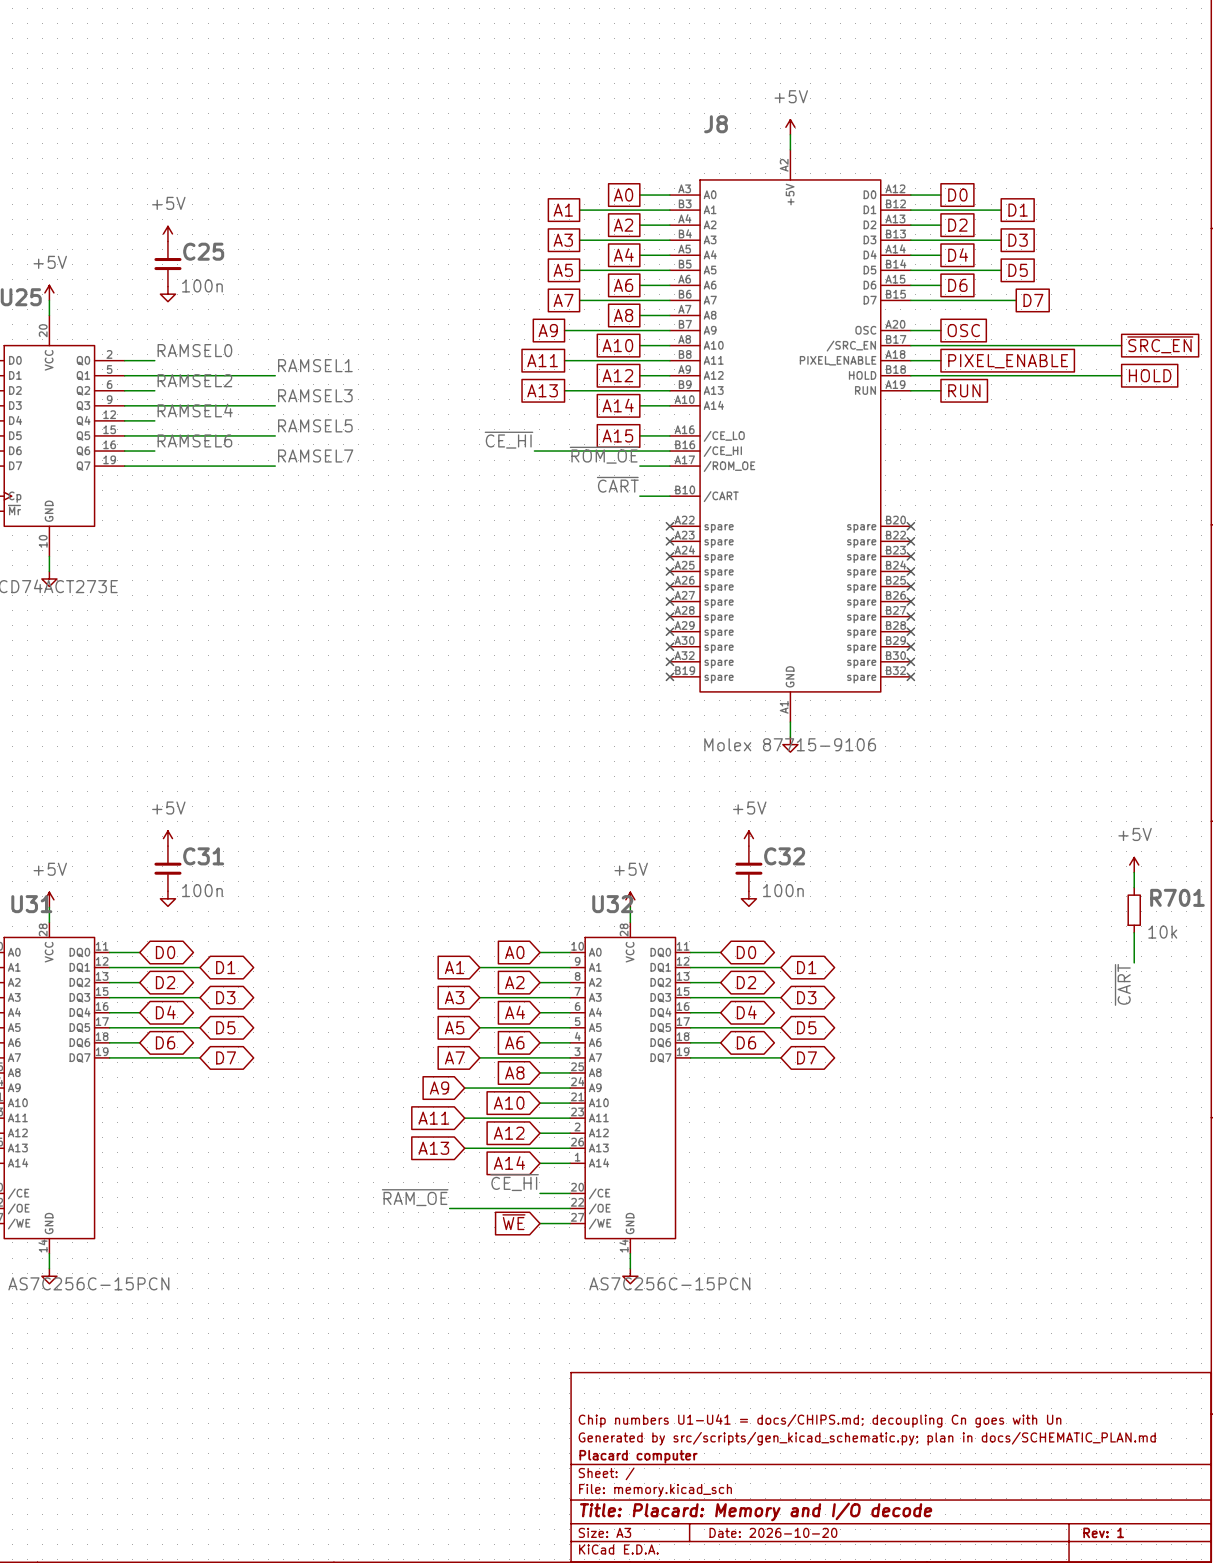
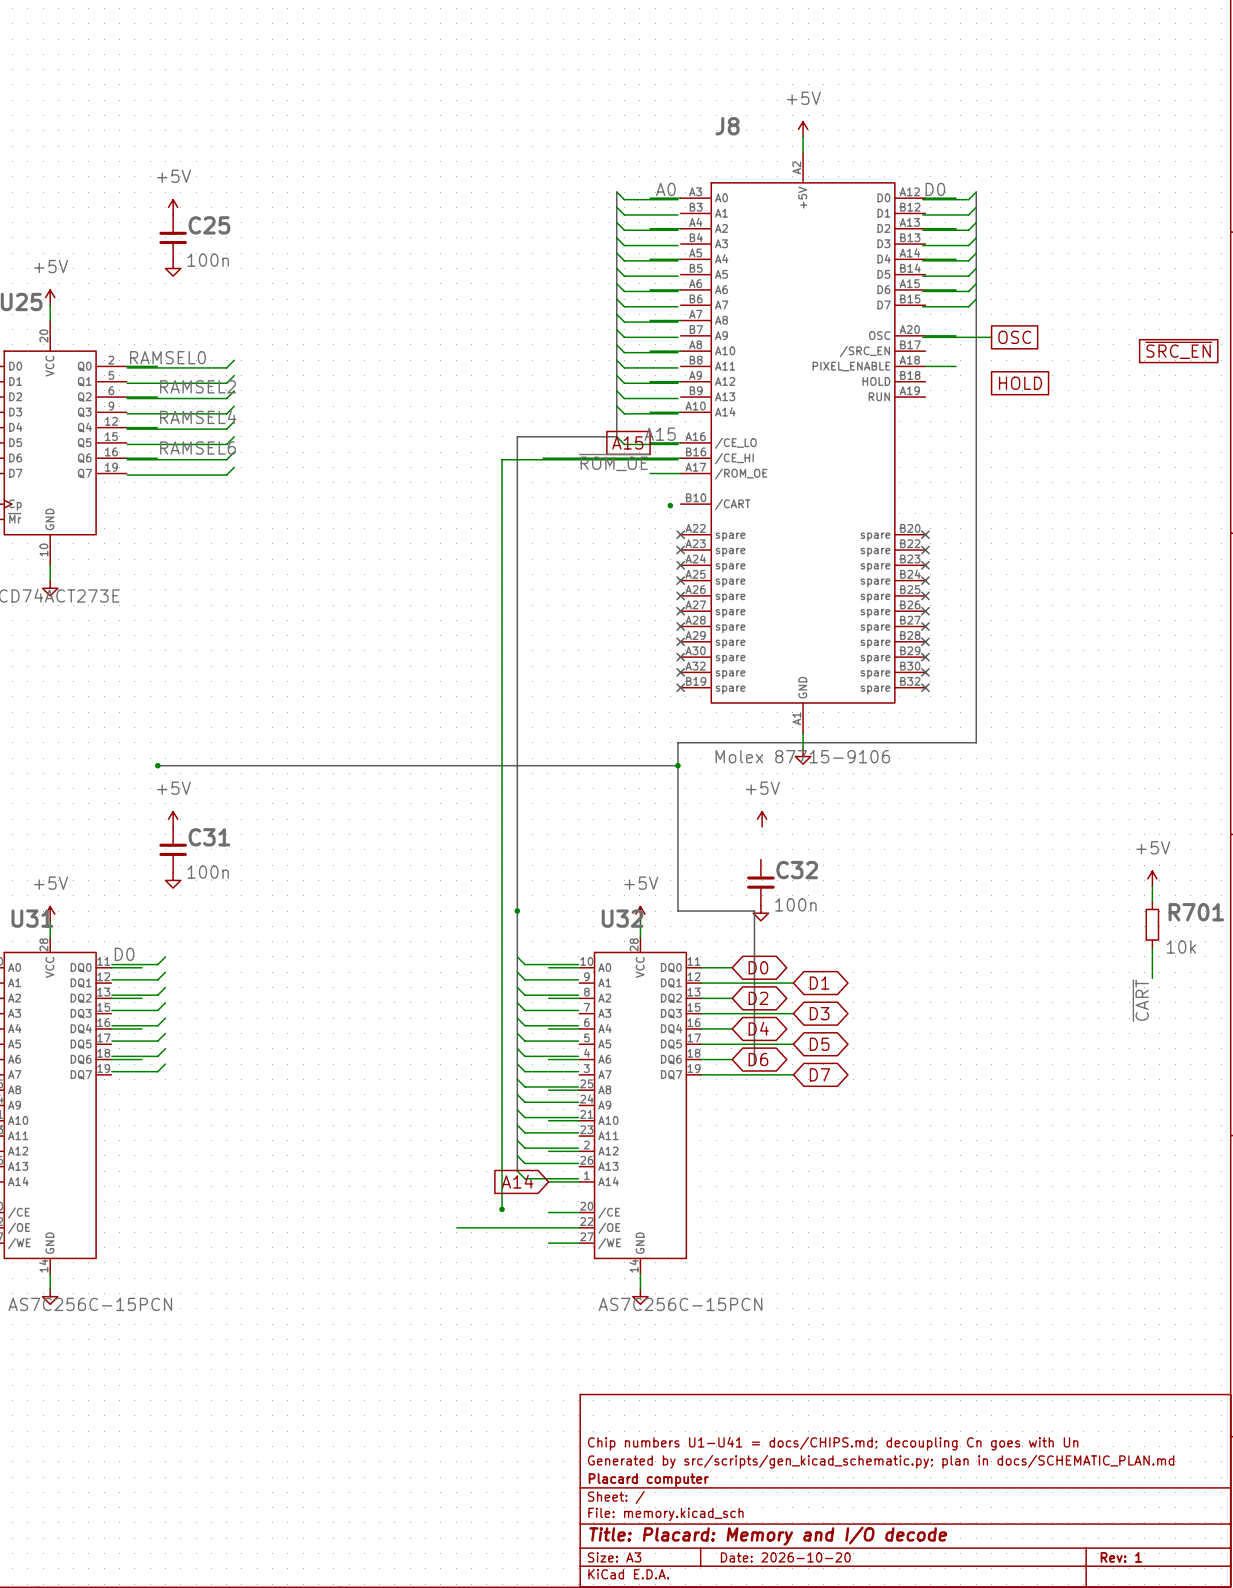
label: none -> A0 (665, 189)
label: none -> D0 (935, 189)
wire: none -> (616, 192) (624, 199) (677, 199)
bus: none -> (616, 192) (616, 436) (517, 436) (517, 1171)
wire: none -> (976, 192) (968, 199) (922, 199)
bus: none -> (976, 192) (976, 742) (677, 742) (677, 911) (754, 911) (754, 1064)
global label: A0 (623, 195) -> none
global label: D0 (957, 195) -> none
wire: none -> (616, 207) (624, 214) (677, 214)
wire: none -> (976, 207) (968, 214) (922, 214)
global label: A1 (563, 210) -> none
wire: (579, 210) (669, 210) -> none
wire: (910, 210) (1001, 210) -> none
global label: D1 (1018, 210) -> none
wire: none -> (616, 222) (624, 230) (677, 230)
wire: none -> (976, 222) (968, 230) (922, 230)
global label: A2 (623, 225) -> none
global label: D2 (957, 225) -> none
power symbol position: +5V (167, 233) -> +5V (173, 207)
wire: none -> (616, 237) (624, 245) (677, 245)
wire: none -> (976, 237) (968, 245) (922, 245)
global label: A3 (563, 240) -> none
wire: (579, 240) (669, 240) -> none
wire: (910, 240) (1001, 240) -> none
global label: D3 (1018, 240) -> none
wire: none -> (616, 253) (624, 260) (677, 260)
wire: none -> (976, 253) (968, 260) (922, 260)
global label: A4 (623, 254) -> none
global label: D4 (958, 254) -> none
C25 position: (167, 264) -> (173, 237)
wire: none -> (616, 268) (624, 276) (677, 276)
wire: none -> (976, 268) (968, 276) (922, 276)
global label: A5 (563, 270) -> none
wire: (579, 270) (669, 270) -> none
wire: (910, 270) (1001, 270) -> none
global label: D5 (1018, 270) -> none
wire: none -> (616, 283) (624, 291) (677, 291)
wire: none -> (976, 283) (968, 291) (922, 291)
global label: A6 (623, 285) -> none
global label: D6 (957, 285) -> none
power symbol position: (167, 294) -> (173, 268)
wire: none -> (616, 299) (624, 306) (677, 306)
wire: none -> (976, 299) (968, 306) (922, 306)
global label: A7 (563, 300) -> none
wire: (579, 300) (669, 300) -> none
wire: (910, 300) (1016, 300) -> none
global label: D7 (1033, 300) -> none
wire: none -> (616, 314) (624, 322) (677, 322)
global label: A8 (623, 315) -> none
wire: none -> (616, 329) (624, 337) (677, 337)
global label: A9 (548, 330) -> none
wire: (564, 330) (669, 330) -> none
global label position: OSC (963, 330) -> OSC (1014, 337)
wire: none -> (922, 337) (991, 337)
wire: none -> (616, 344) (624, 352) (677, 352)
global label: A10 (617, 345) -> none
wire: (910, 345) (1121, 345) -> none
label position: RAMSEL0 (194, 350) -> RAMSEL0 (167, 357)
wire: none -> (234, 360) (226, 367) (127, 367)
wire: none -> (616, 360) (624, 367) (677, 367)
global label: A11 (542, 360) -> none
wire: (564, 360) (669, 360) -> none
global label: PIXEL_ENABLE (1008, 361) -> none
label: RAMSEL1 (315, 365) -> none
wire: none -> (234, 375) (226, 383) (127, 383)
wire: none -> (616, 375) (624, 383) (677, 383)
wire: (124, 375) (275, 375) -> none
global label: A12 (617, 375) -> none
wire: (910, 375) (1121, 375) -> none
global label position: HOLD (1150, 375) -> HOLD (1020, 383)
wire: none -> (234, 390) (226, 398) (127, 398)
wire: none -> (616, 390) (624, 398) (677, 398)
global label: A13 (542, 390) -> none
wire: (564, 390) (669, 390) -> none
wire: (910, 390) (940, 390) -> none
global label: RUN (964, 390) -> none
label: RAMSEL3 (315, 395) -> none
wire: none -> (234, 406) (226, 413) (127, 413)
wire: none -> (616, 406) (624, 413) (677, 413)
wire: (124, 405) (275, 405) -> none
global label: A14 (618, 405) -> none
wire: none -> (234, 421) (226, 429) (127, 429)
label: RAMSEL5 (315, 425) -> none
label: none -> A15 (660, 434)
wire: none -> (234, 436) (226, 444) (127, 444)
wire: none -> (616, 436) (624, 444) (677, 444)
wire: (124, 435) (275, 435) -> none
label: ~{CE_HI} (509, 440) -> none
wire: none -> (234, 452) (226, 459) (127, 459)
wire: none -> (677, 459) (502, 459) (502, 1209)
label: RAMSEL7 (315, 456) -> none
wire: none -> (234, 467) (226, 475) (127, 475)
wire: (124, 466) (275, 466) -> none
label: ~{CART} (617, 484) -> none
wire: (639, 496) (669, 496) -> none
junction: none -> (670, 505)
bus: none -> (157, 765) (677, 765)
junction: none -> (157, 765)
junction: none -> (677, 765)
power symbol position: +5V (167, 838) -> +5V (173, 819)
power symbol position: +5V (748, 838) -> +5V (762, 819)
C31 position: (167, 868) -> (173, 849)
junction: none -> (517, 911)
power symbol position: (167, 898) -> (173, 880)
label: none -> D0 (124, 954)
wire: none -> (165, 956) (157, 964) (111, 964)
wire: none -> (517, 956) (524, 964) (578, 964)
global label: D0 (165, 952) -> none
global label: A0 (514, 952) -> none
wire: none -> (165, 972) (157, 979) (111, 979)
wire: none -> (517, 972) (524, 979) (578, 979)
wire: (109, 967) (199, 967) -> none
global label: D1 (225, 967) -> none
global label: A1 (454, 967) -> none
wire: (479, 967) (570, 967) -> none
wire: none -> (165, 987) (157, 995) (111, 995)
wire: none -> (517, 987) (524, 995) (578, 995)
global label: D2 (165, 982) -> none
global label: A2 (514, 982) -> none
wire: none -> (165, 1002) (157, 1010) (111, 1010)
wire: none -> (517, 1002) (524, 1010) (578, 1010)
wire: (109, 997) (199, 997) -> none
global label: D3 (225, 997) -> none
global label: A3 (454, 997) -> none
wire: (479, 997) (570, 997) -> none
wire: none -> (165, 1018) (157, 1025) (111, 1025)
wire: none -> (517, 1018) (524, 1025) (578, 1025)
global label: D4 (165, 1012) -> none
global label: A4 (515, 1012) -> none
wire: none -> (165, 1033) (157, 1041) (111, 1041)
wire: none -> (517, 1033) (524, 1041) (578, 1041)
wire: (109, 1027) (199, 1027) -> none
global label: D5 (225, 1027) -> none
global label: A5 (454, 1027) -> none
wire: (479, 1027) (570, 1027) -> none
wire: none -> (165, 1048) (157, 1056) (111, 1056)
wire: none -> (517, 1048) (524, 1056) (578, 1056)
global label: D6 (165, 1042) -> none
global label: A6 (514, 1042) -> none
wire: none -> (165, 1064) (157, 1071) (111, 1071)
wire: none -> (517, 1064) (524, 1071) (578, 1071)
wire: (109, 1057) (199, 1057) -> none
global label: D7 (226, 1057) -> none
global label: A7 (454, 1057) -> none
wire: (479, 1057) (570, 1057) -> none
wire: none -> (517, 1079) (524, 1086) (578, 1086)
global label: A8 (514, 1072) -> none
wire: none -> (517, 1094) (524, 1102) (578, 1102)
global label: A9 (439, 1088) -> none
wire: (464, 1088) (570, 1088) -> none
wire: none -> (517, 1109) (524, 1117) (578, 1117)
global label: A10 (509, 1103) -> none
wire: none -> (517, 1125) (524, 1132) (578, 1132)
global label: A11 (433, 1118) -> none
wire: (464, 1118) (570, 1118) -> none
wire: none -> (517, 1140) (524, 1148) (578, 1148)
global label: A12 (509, 1133) -> none
wire: none -> (517, 1155) (524, 1163) (578, 1163)
global label: A13 (433, 1148) -> none
wire: (464, 1148) (570, 1148) -> none
wire: none -> (517, 1171) (524, 1178) (578, 1178)
label: ~{CE_HI} (514, 1182) -> none
junction: none -> (502, 1209)
label: ~{RAM_OE} (415, 1197) -> none
global label: ~{WE} (513, 1222) -> none

